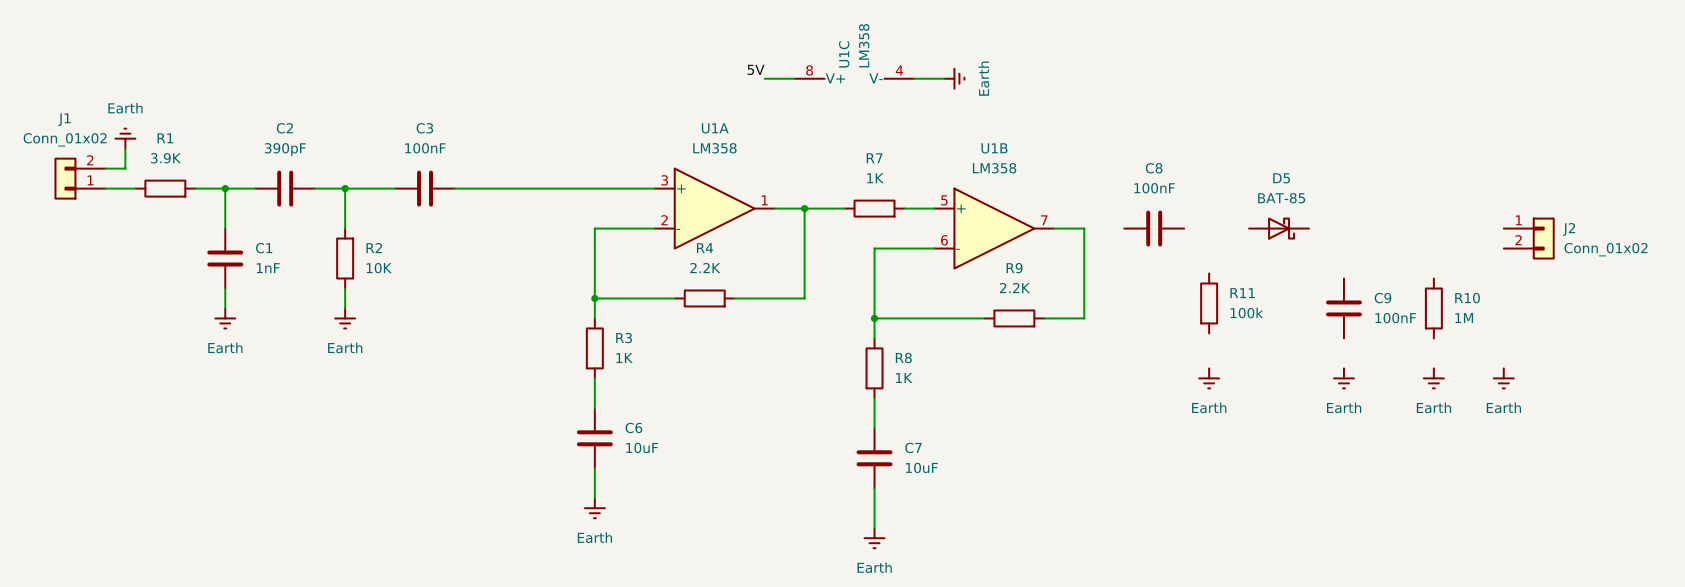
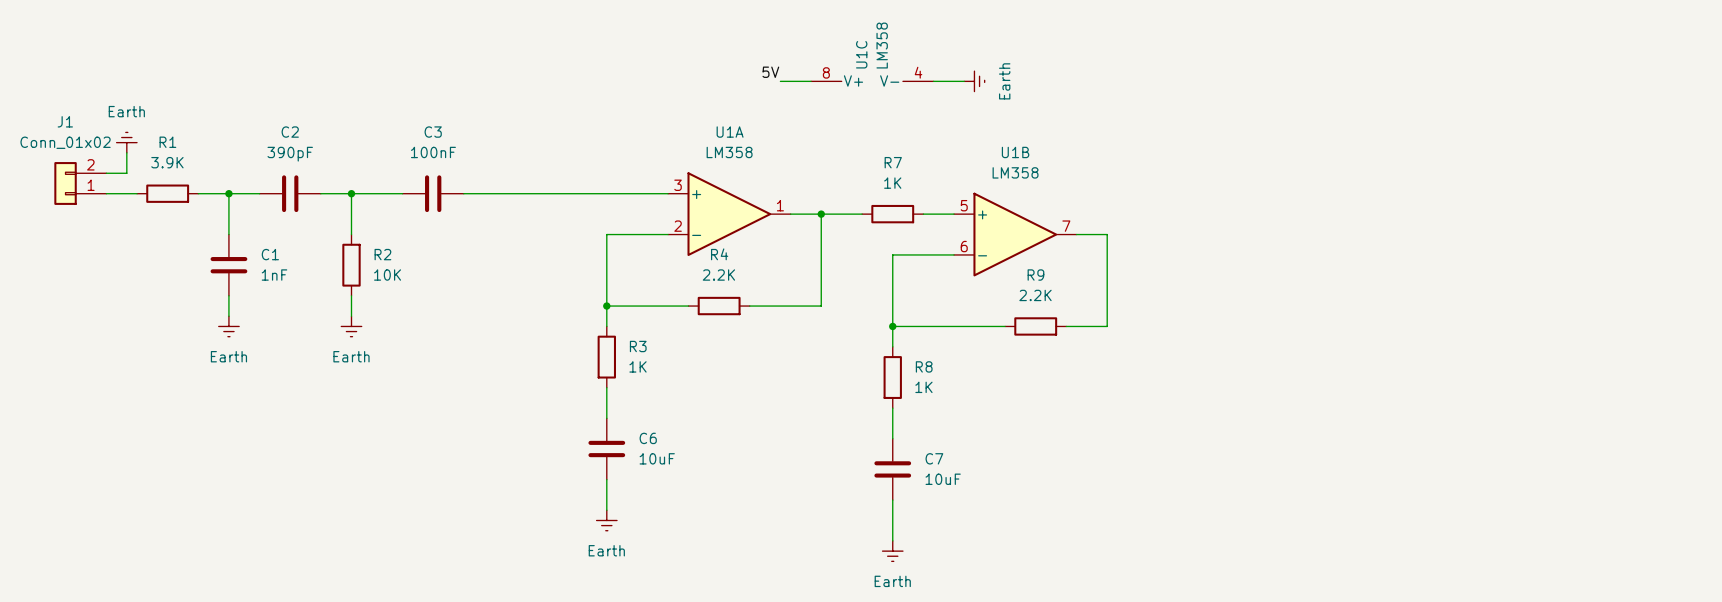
C8: 100nF (1154, 228) -> none
D5: BAT-85 (1279, 228) -> none
J2: Conn_01x02 (1529, 238) -> none
R11: 100k (1209, 303) -> none
C9: 100nF (1343, 308) -> none
R10: 1M (1433, 308) -> none
power symbol: Earth (1209, 378) -> none
power symbol: Earth (1343, 378) -> none
power symbol: Earth (1433, 378) -> none
power symbol: Earth (1503, 378) -> none

